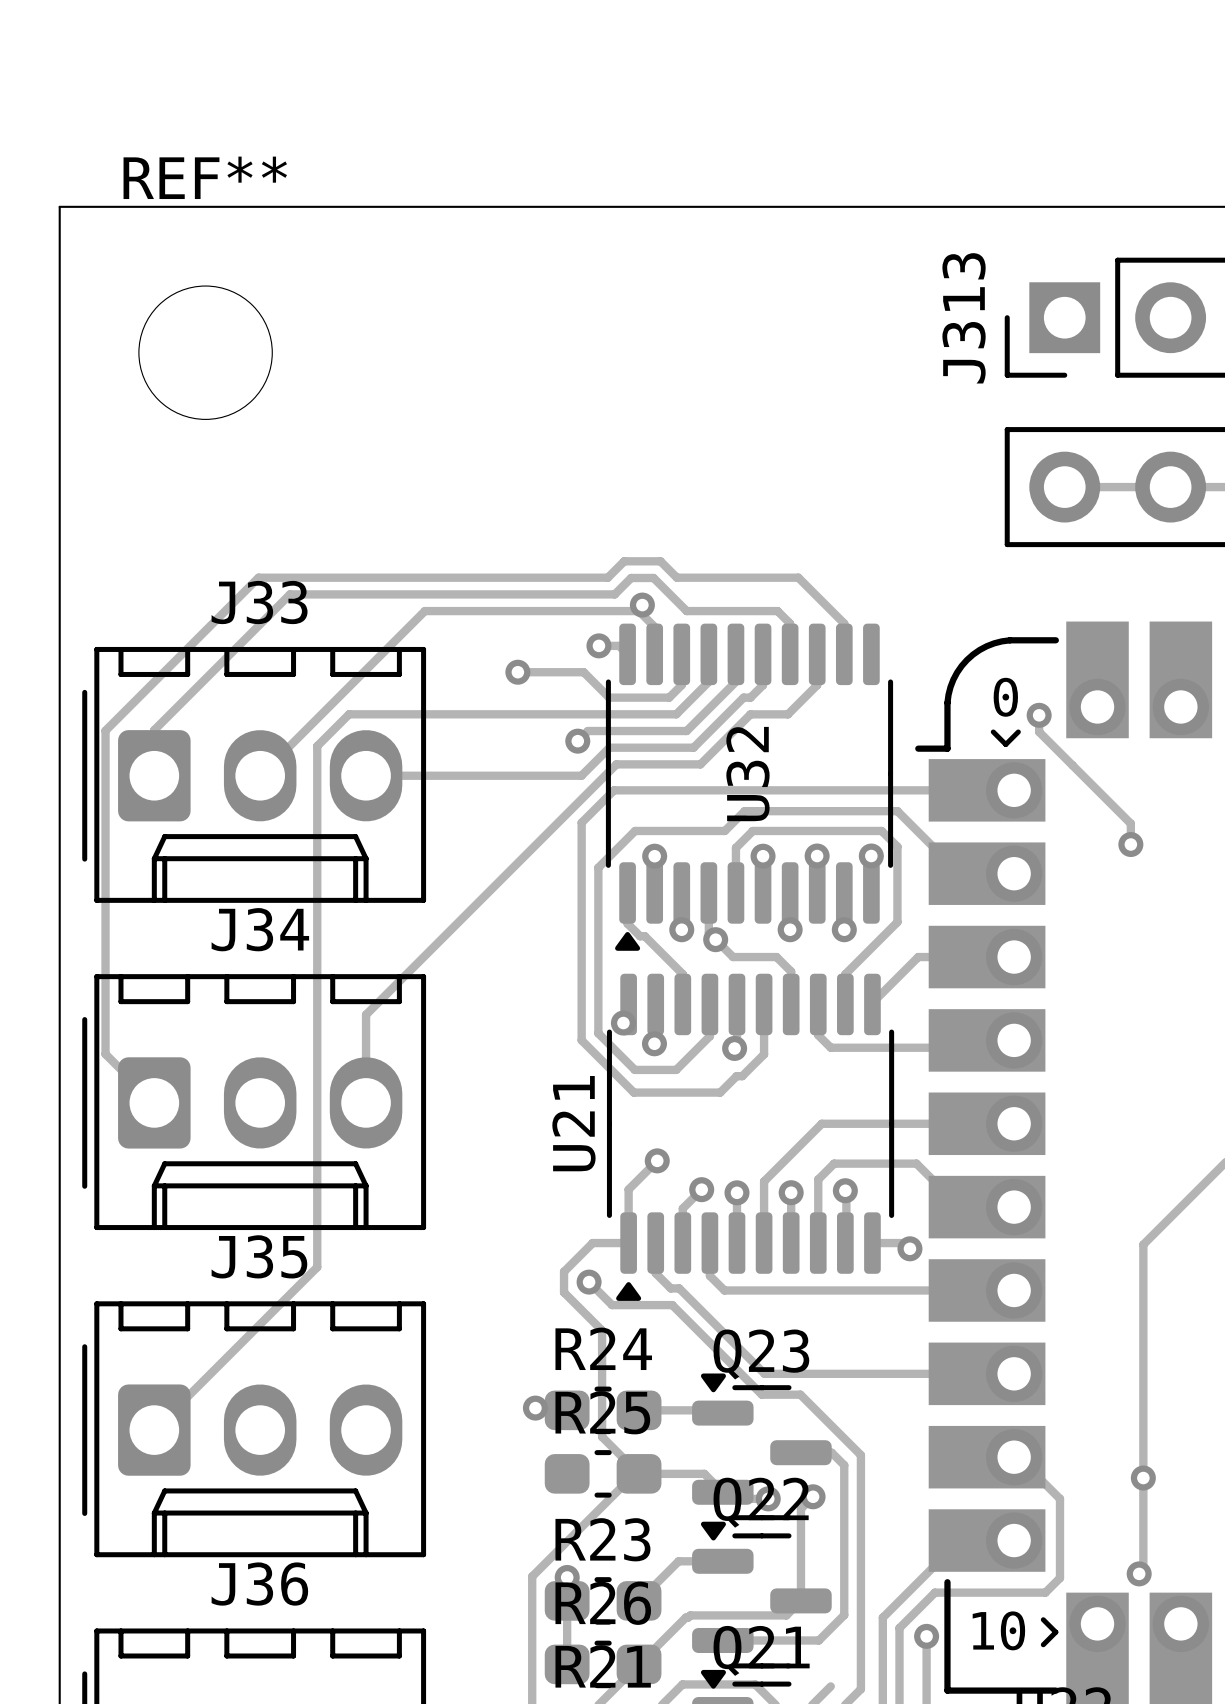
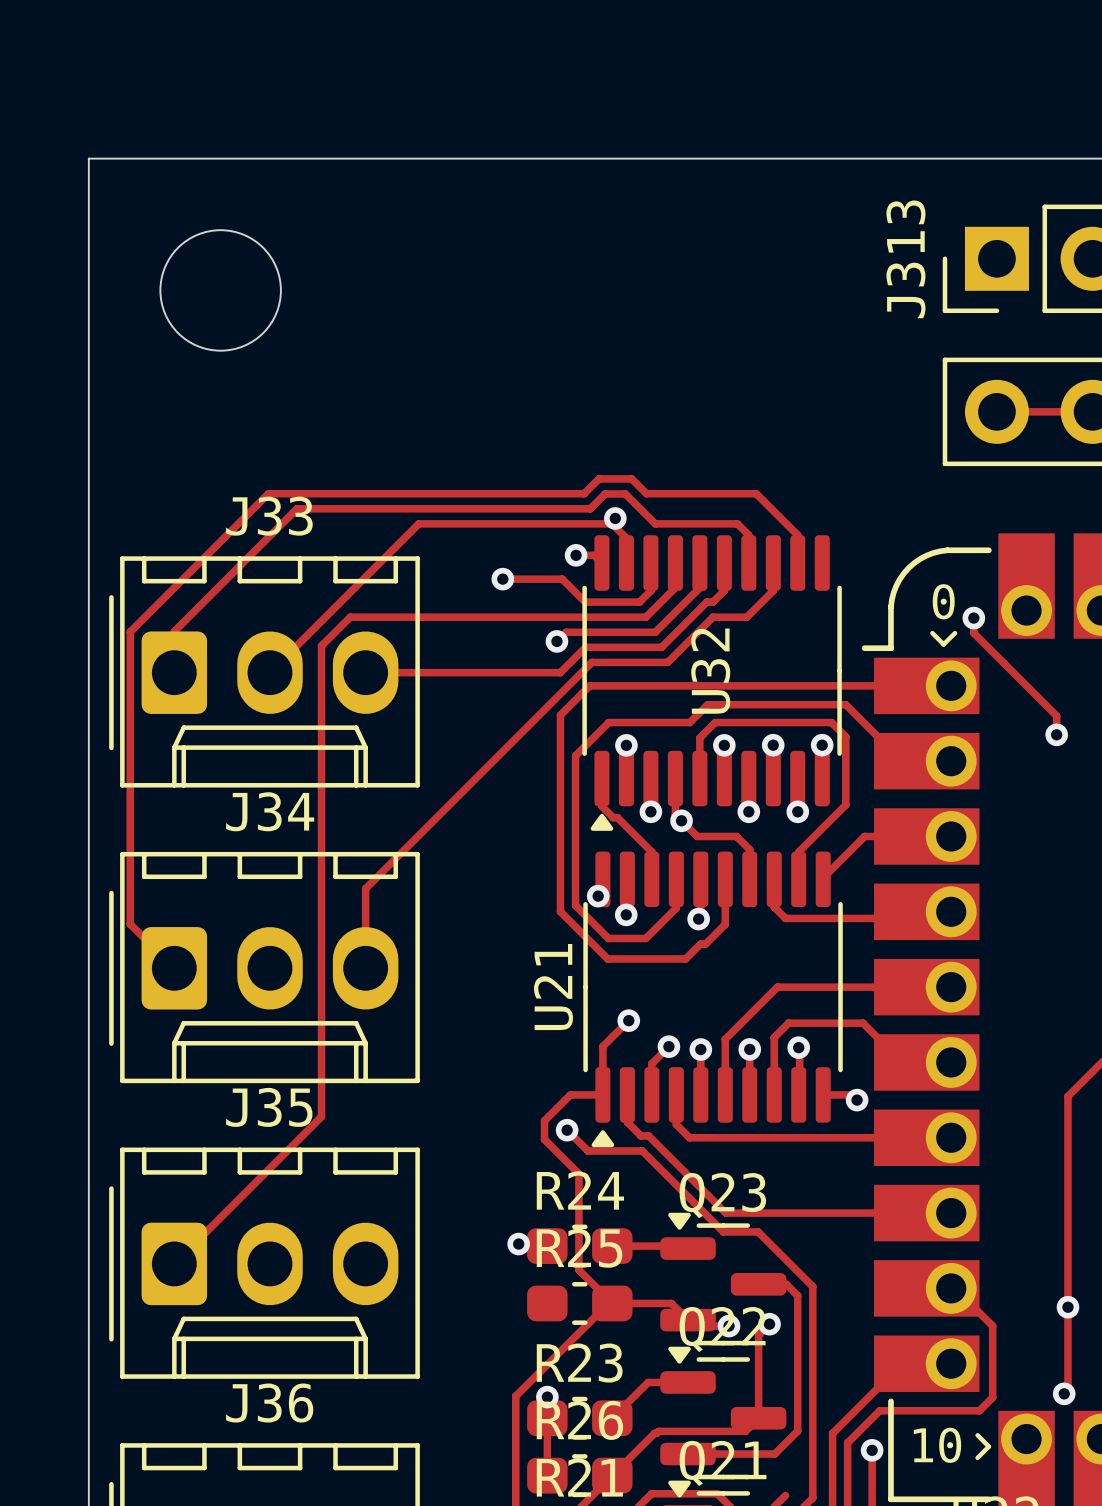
REF** name: REF** (205, 177) -> none

